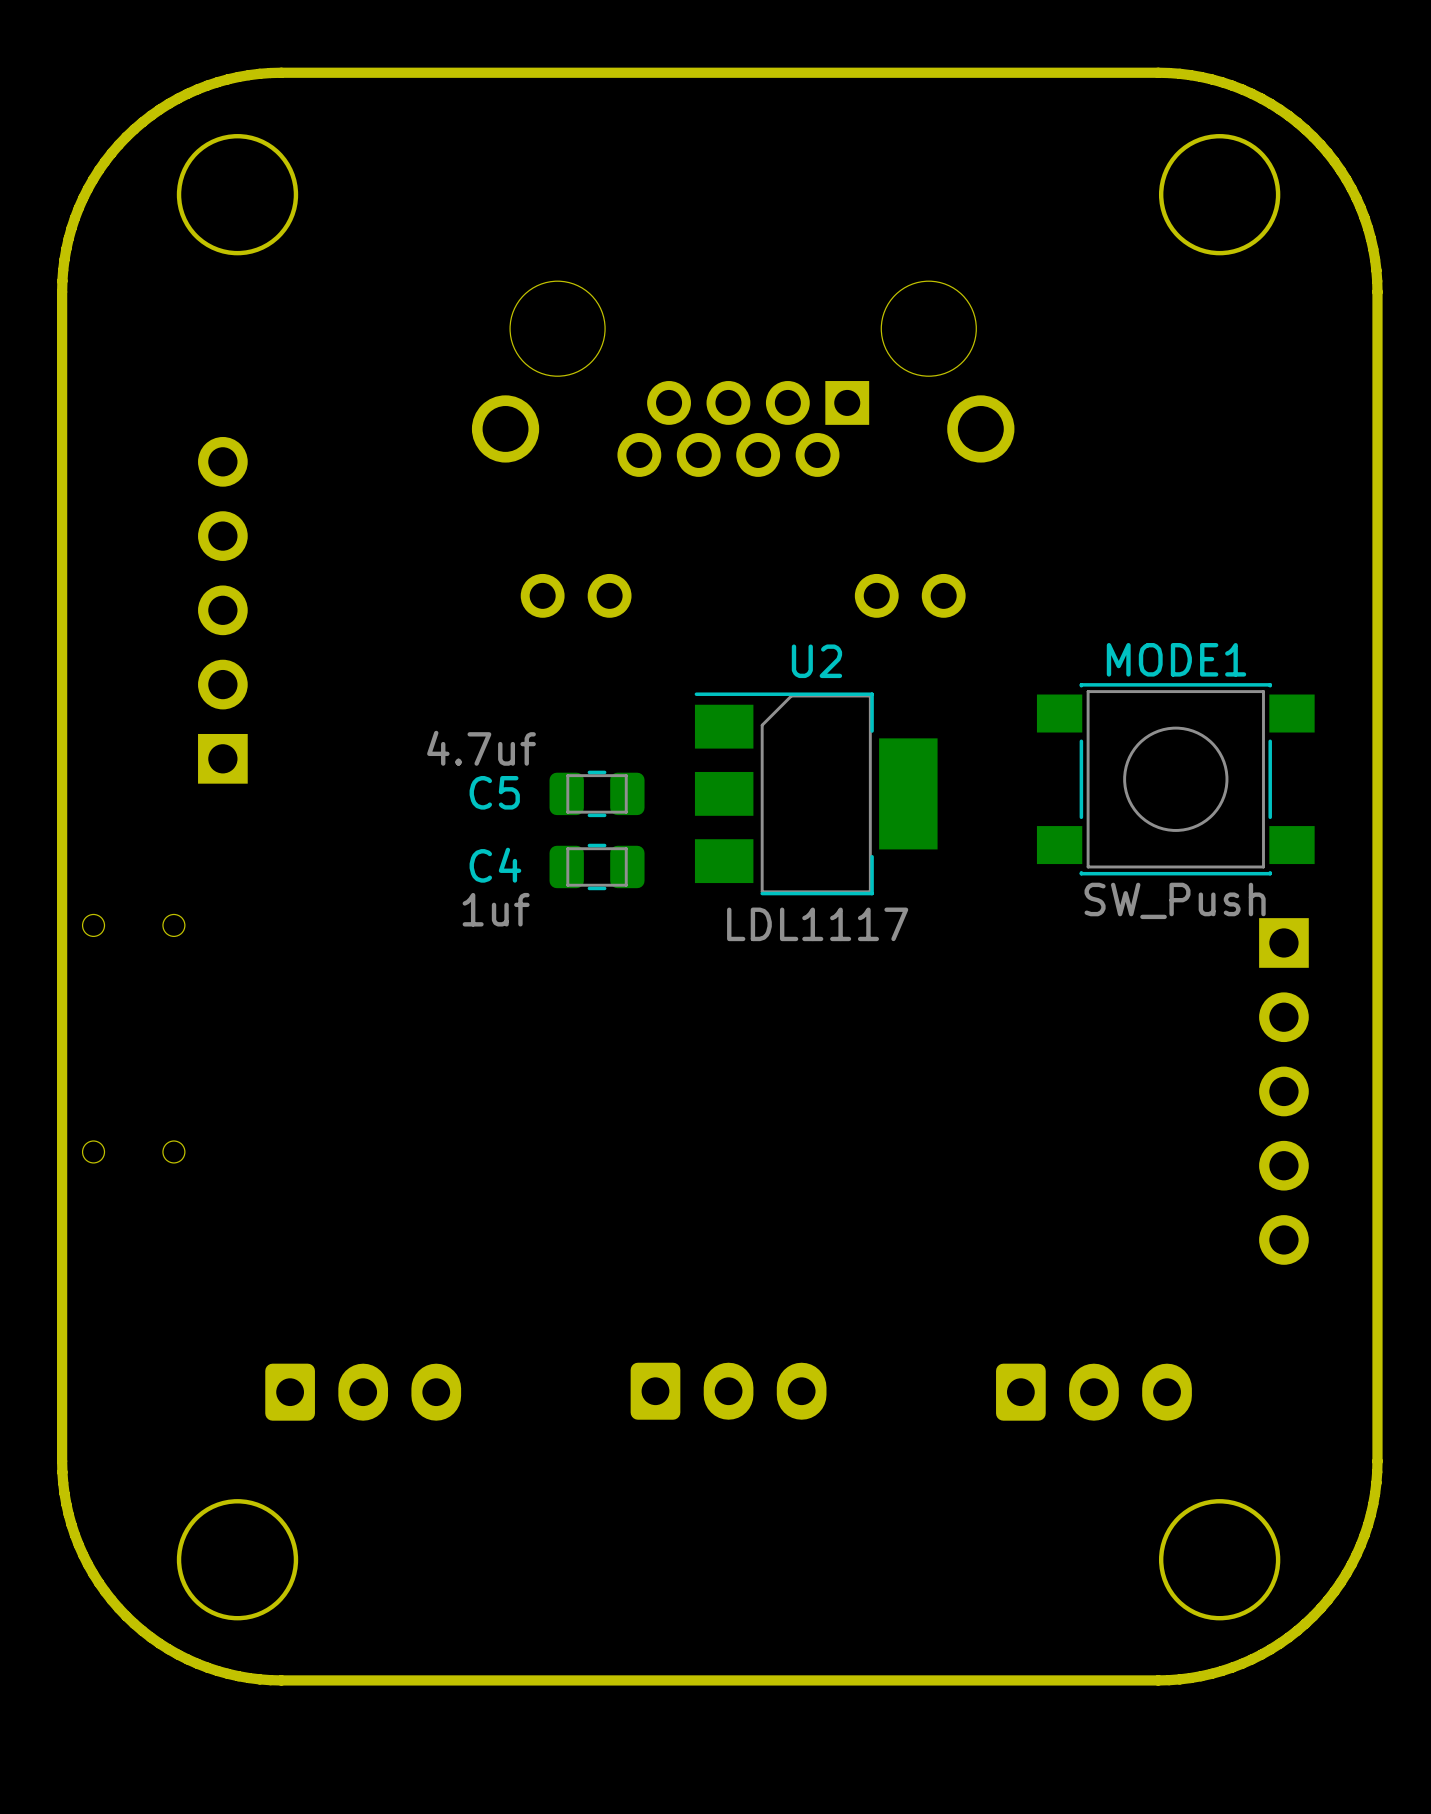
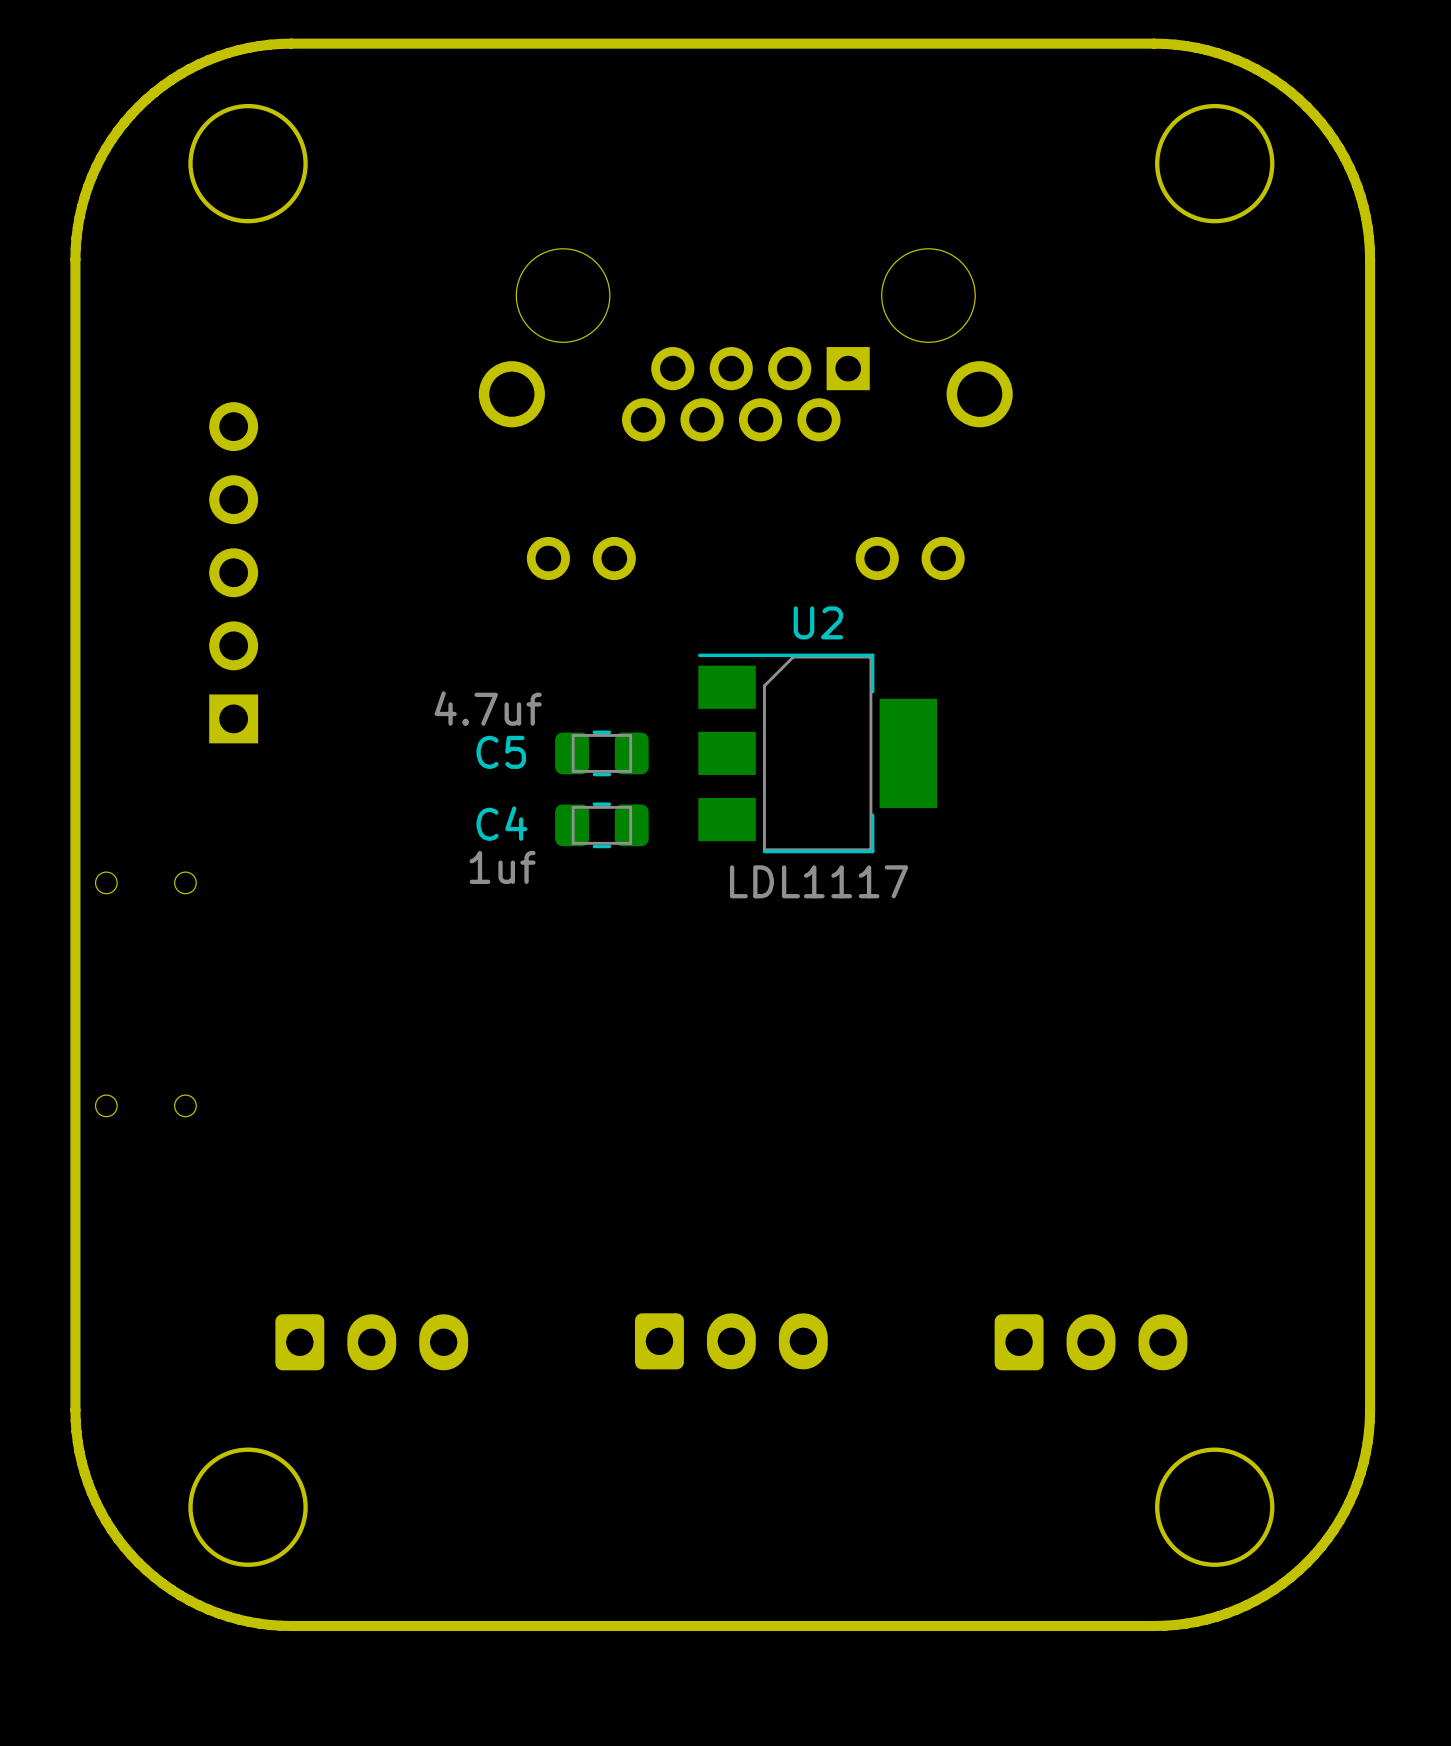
MODE1: SW_Push (1175, 779) -> none
part: (1283, 1091) -> none

